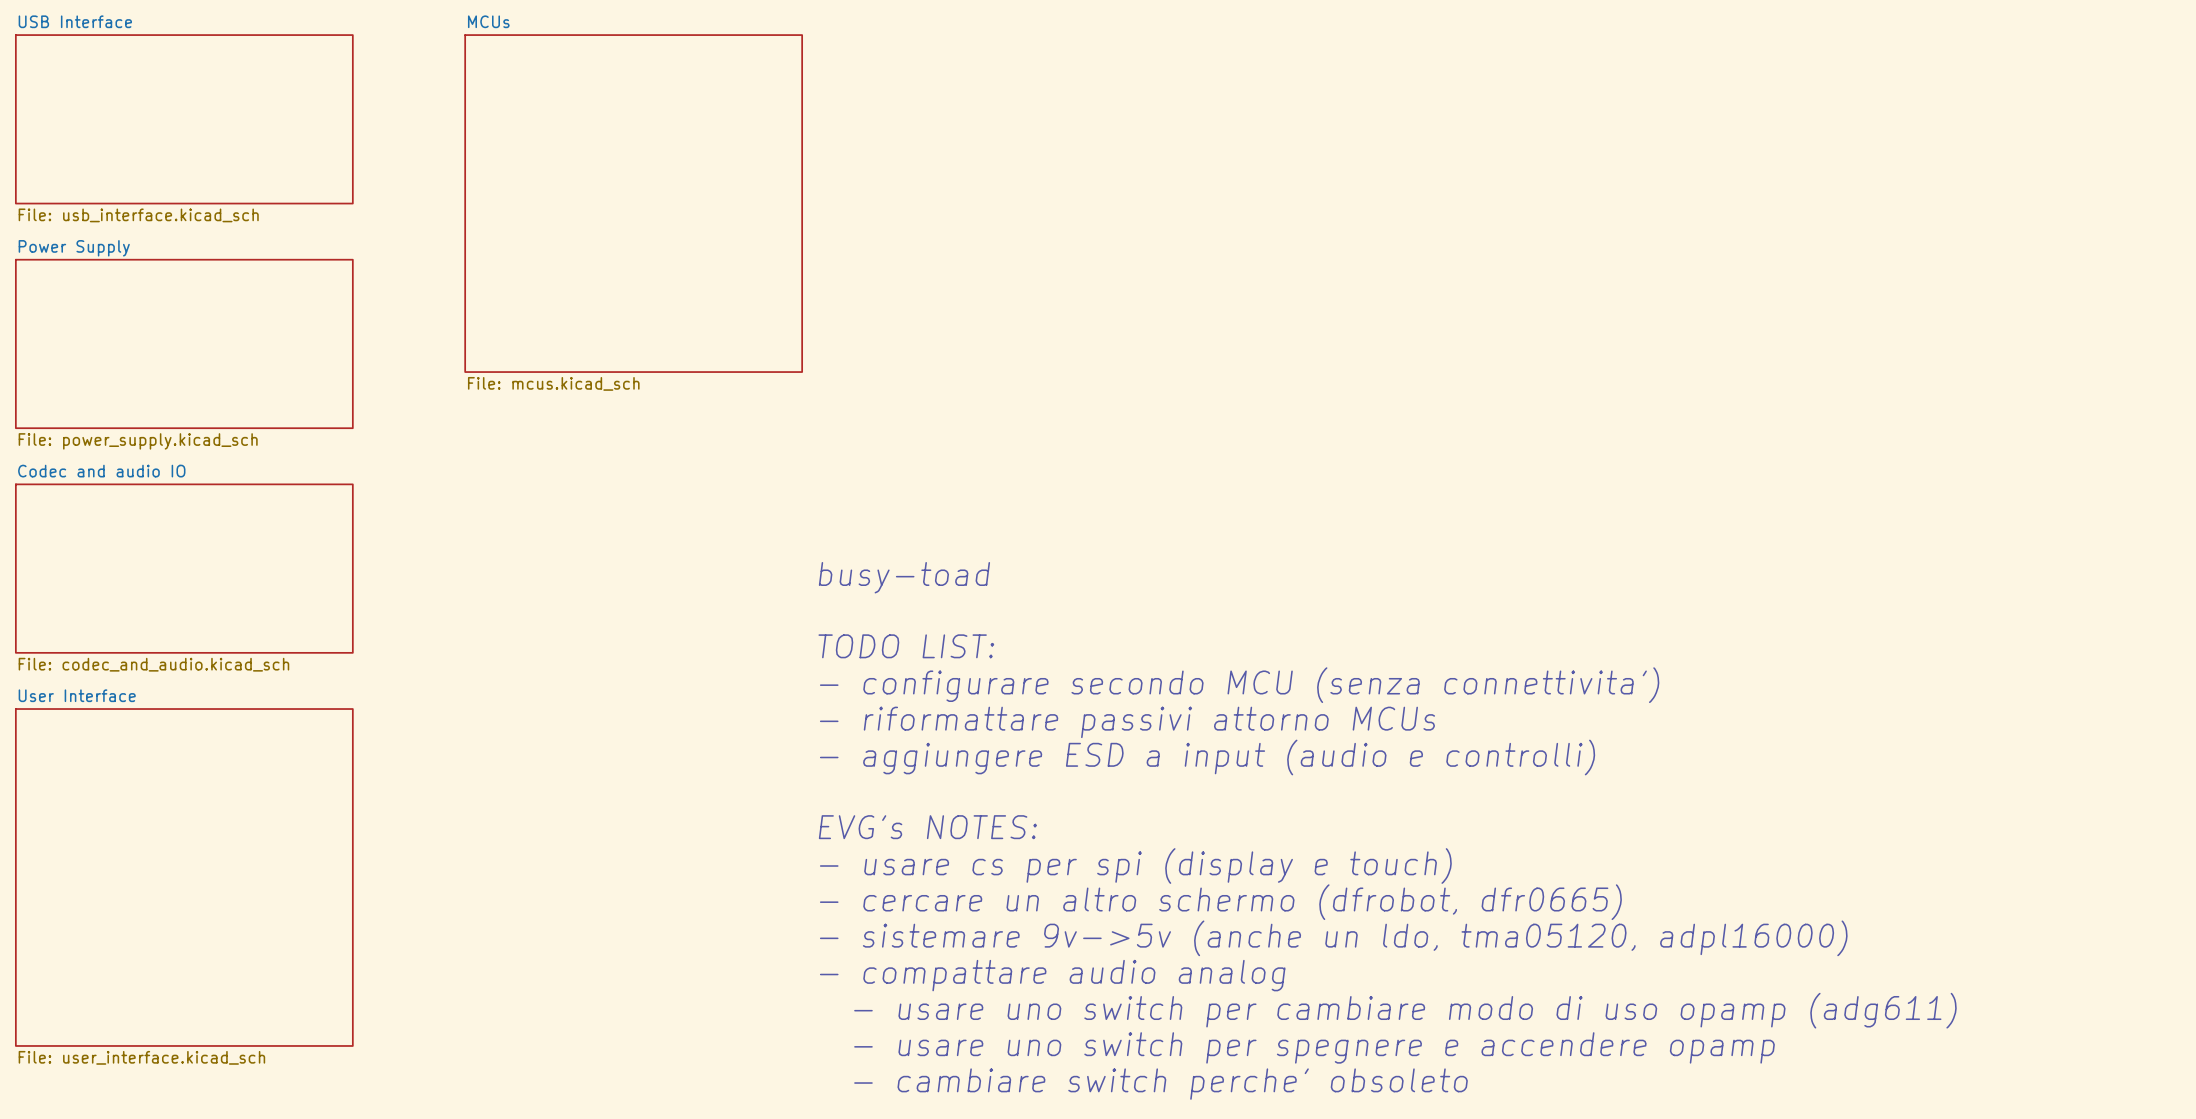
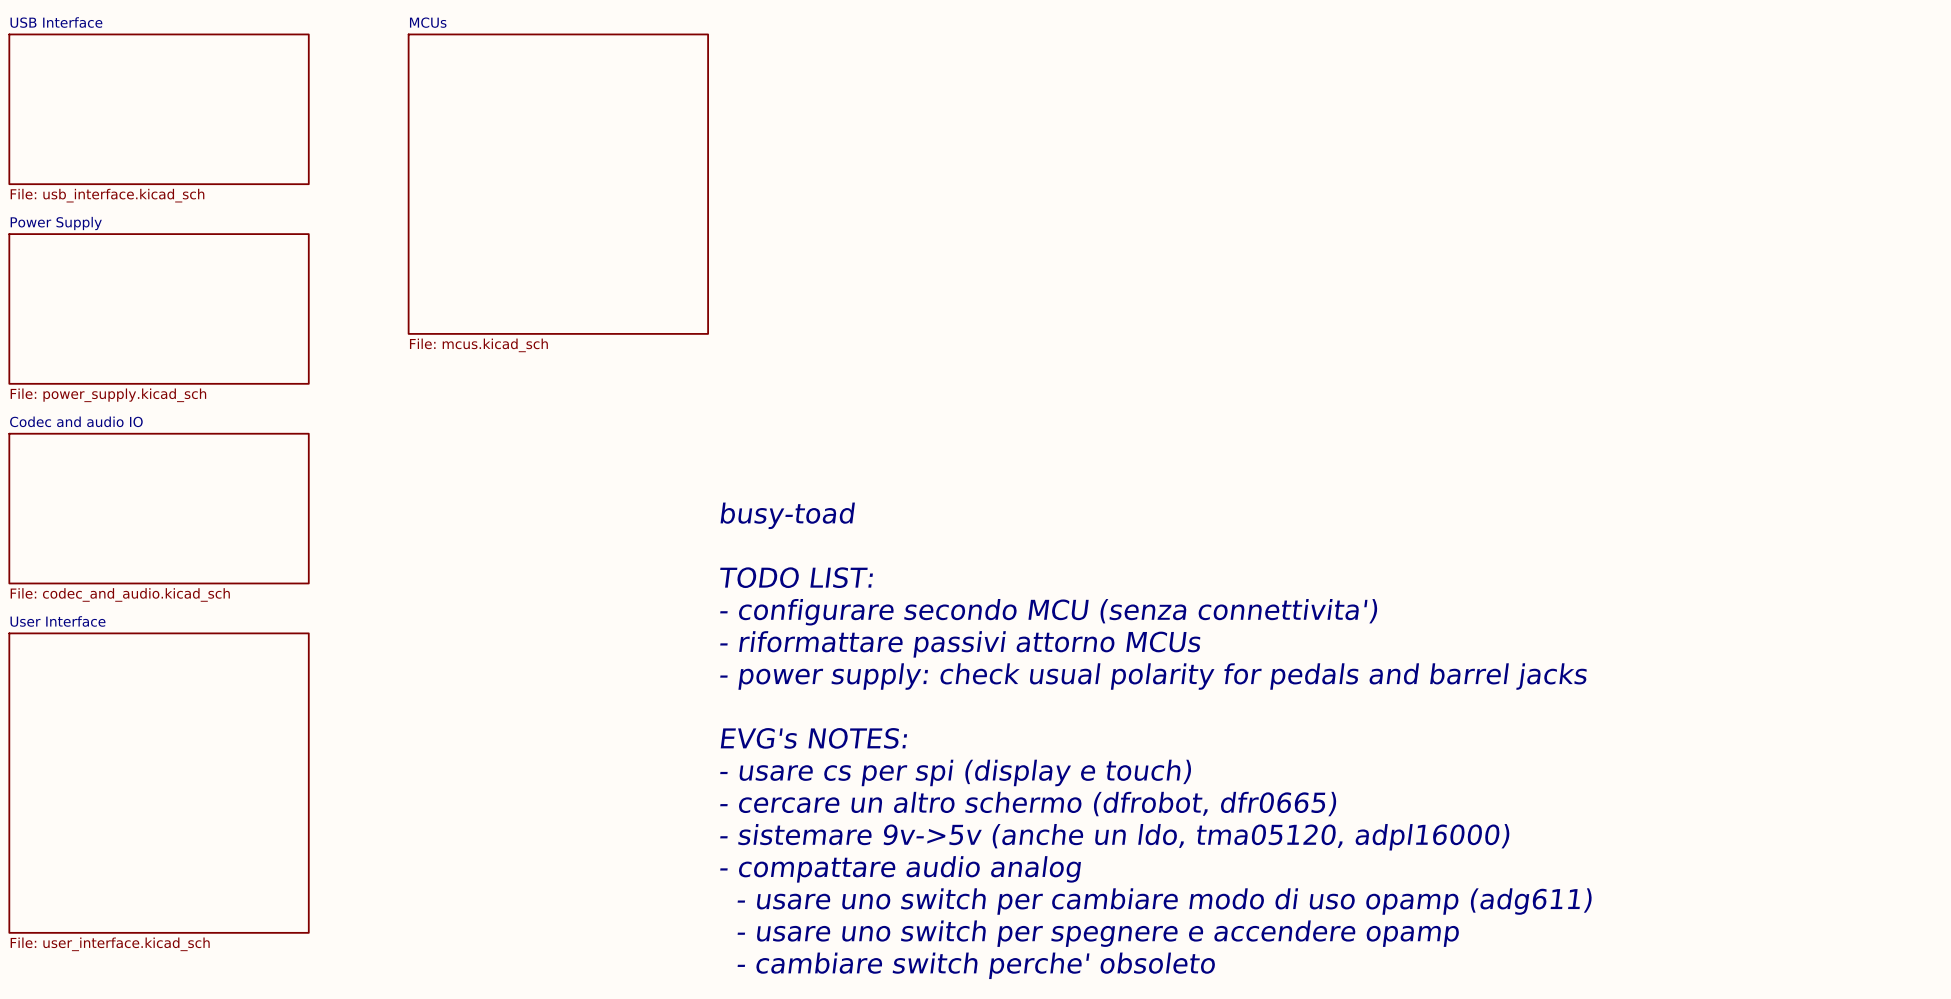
text: - aggiungere ESD a input (audio e controlli) (1207, 757) -> - power supply: check usual polarity for pedals and barrel jacks (1153, 676)

